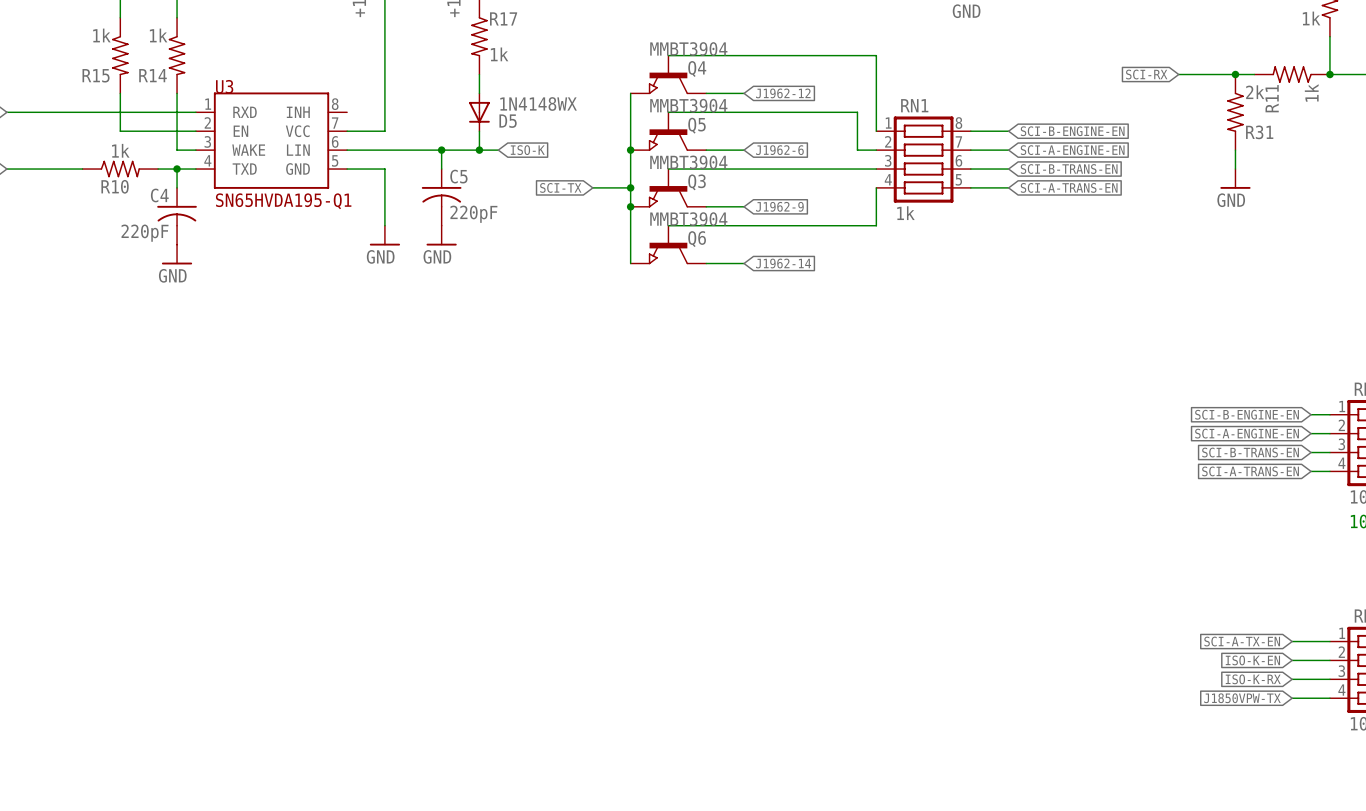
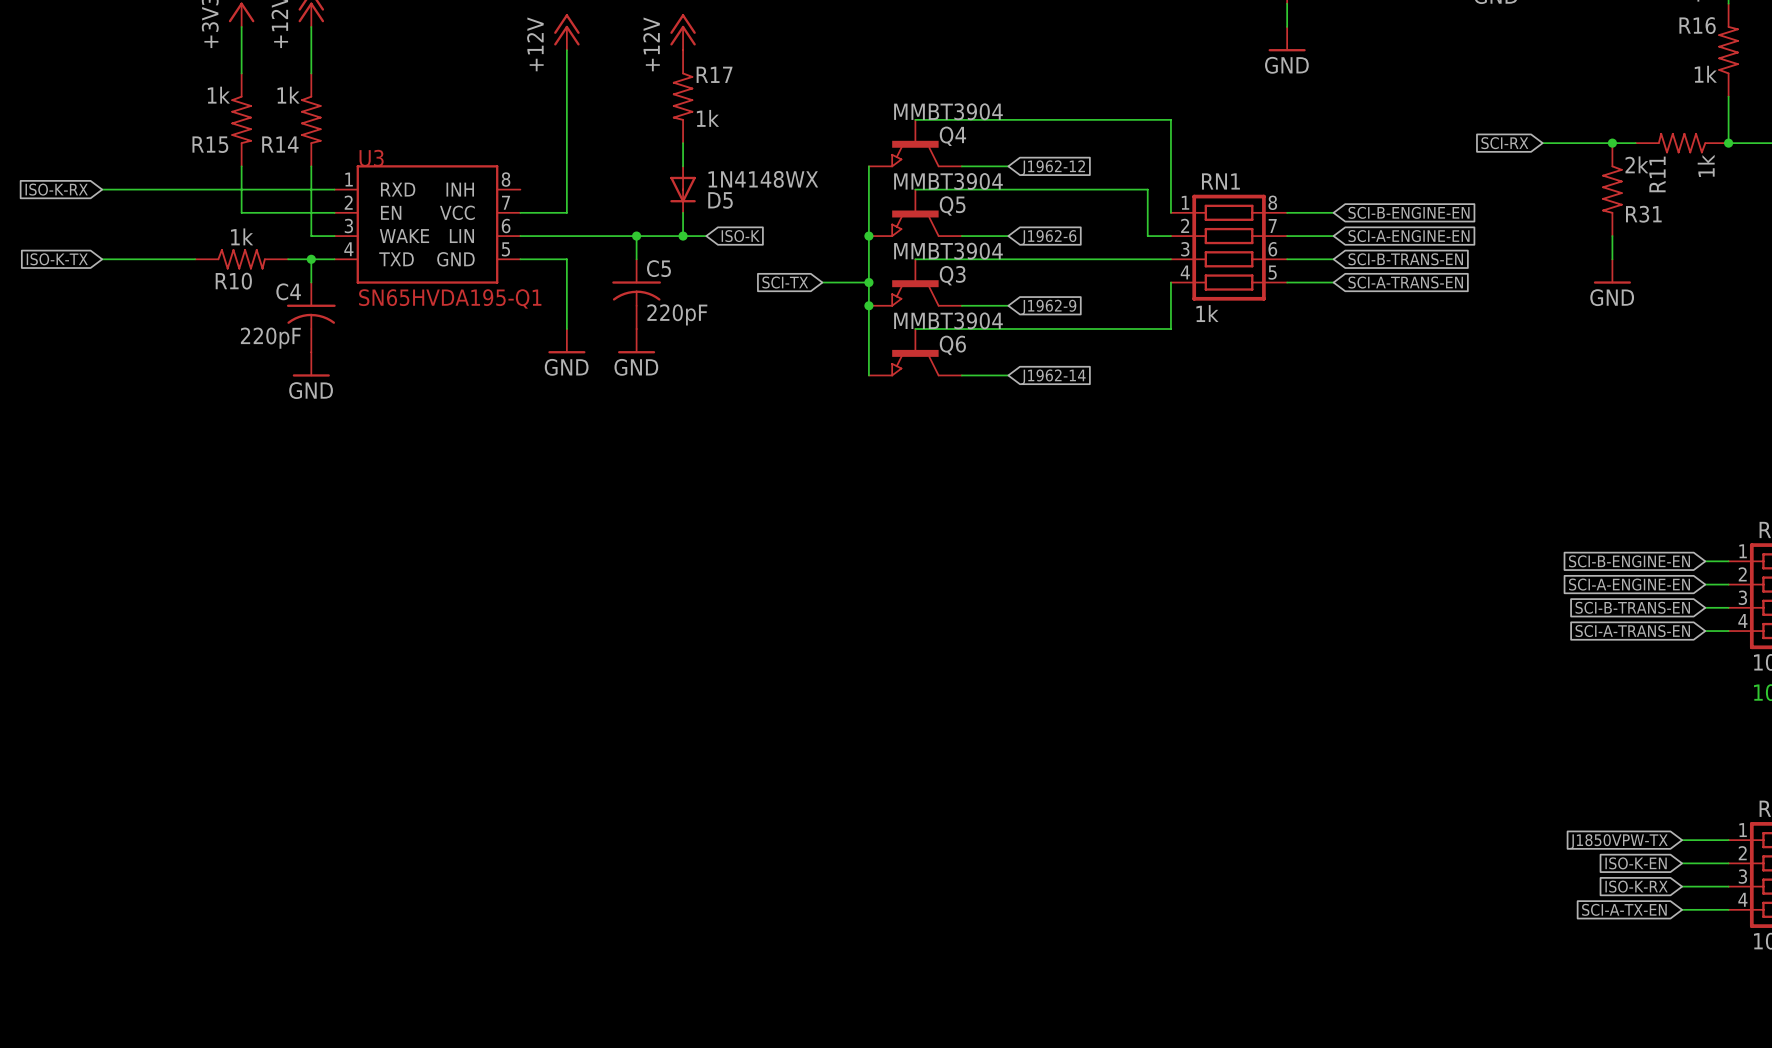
global label: SCI-A-TX-EN (1242, 641) -> J1850VPW-TX (1619, 841)
global label: J1850VPW-TX (1242, 698) -> SCI-A-TX-EN (1624, 909)

